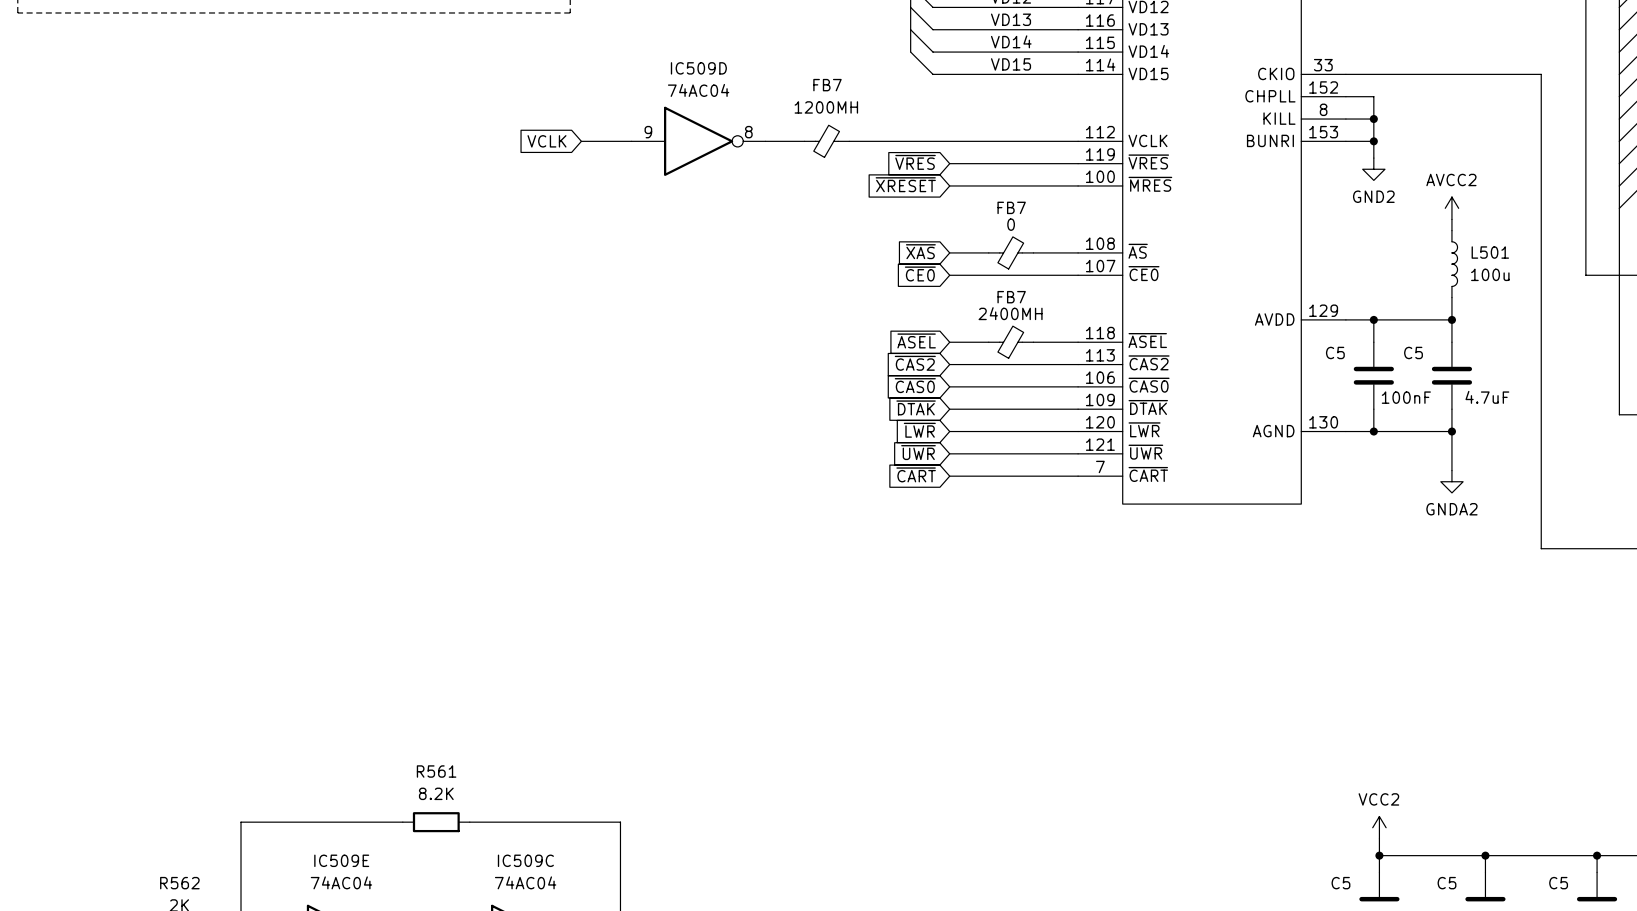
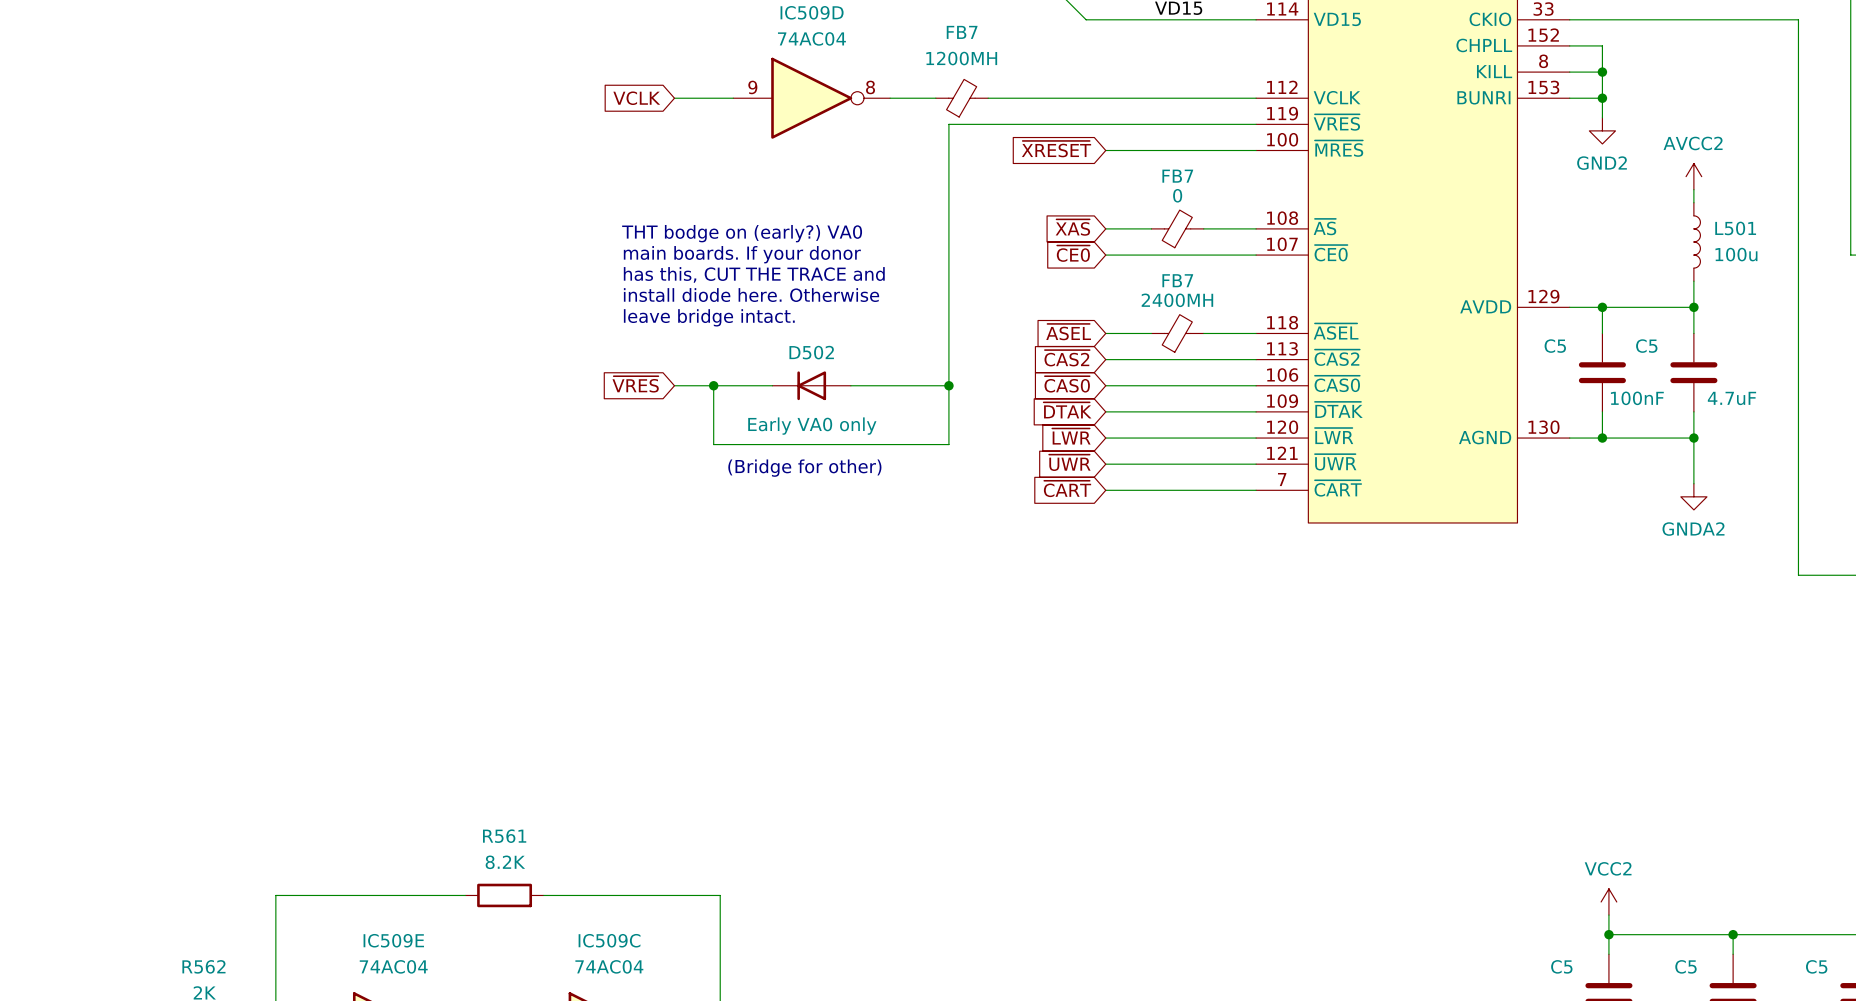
global label: ~{VRES} (915, 162) -> none
wire: none -> (1105, 124) (948, 124) (948, 444) (713, 444) (713, 385)
text: none -> THT bodge on (early?) VA0 (742, 233)
text: none -> main boards. If your donor (742, 254)
text: none -> has this, CUT THE TRACE and (754, 274)
text: none -> install diode here. Otherwise (751, 295)
text: none -> leave bridge intact. (709, 317)
global label: none -> ~{VRES} (635, 384)
wire: none -> (674, 385) (772, 385)
junction: none -> (713, 385)
D502: none -> Early VA0 only (811, 385)
wire: none -> (850, 385) (948, 385)
junction: none -> (948, 385)
text: none -> (Bridge for other) (804, 468)

